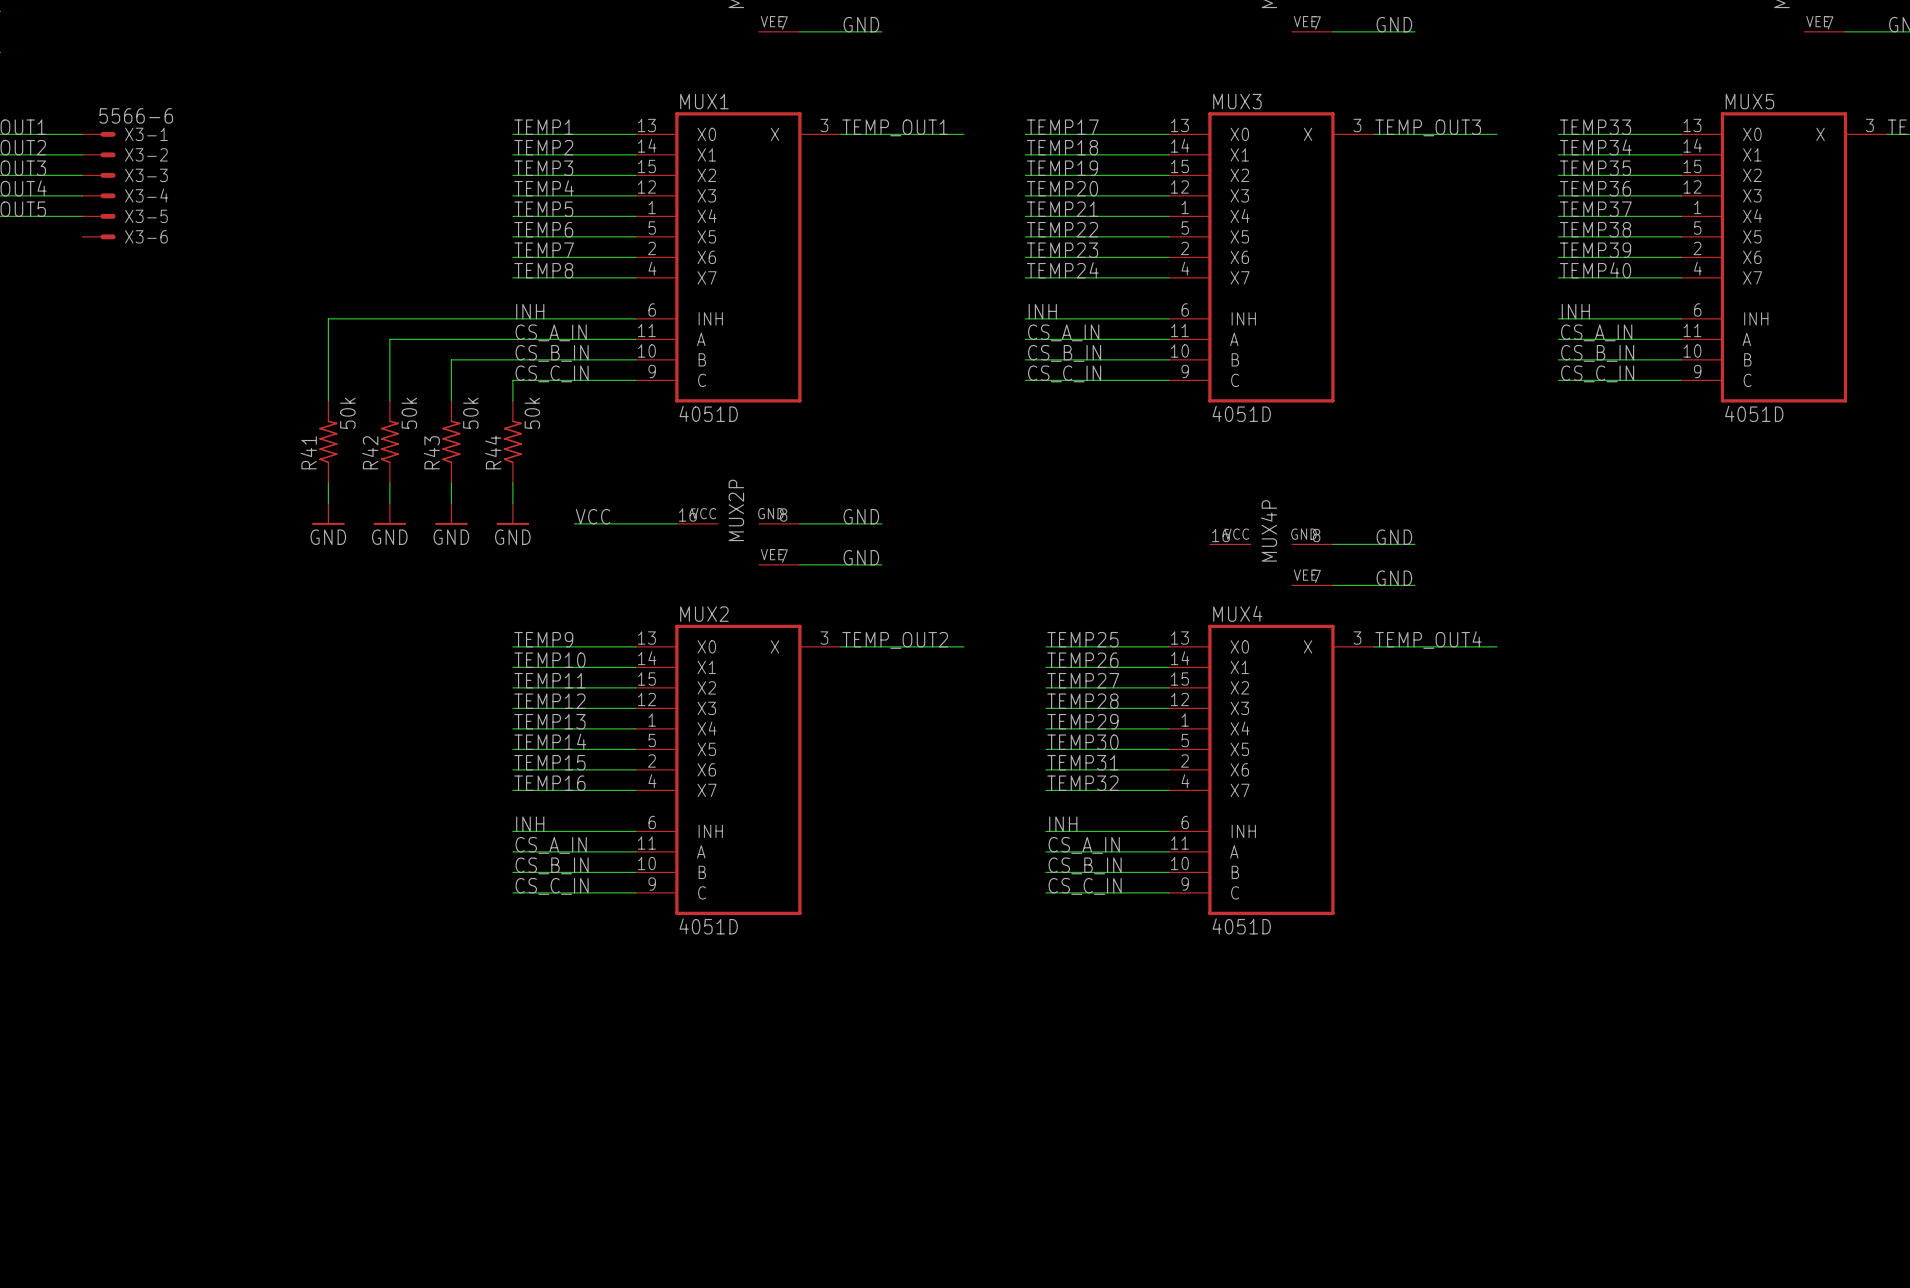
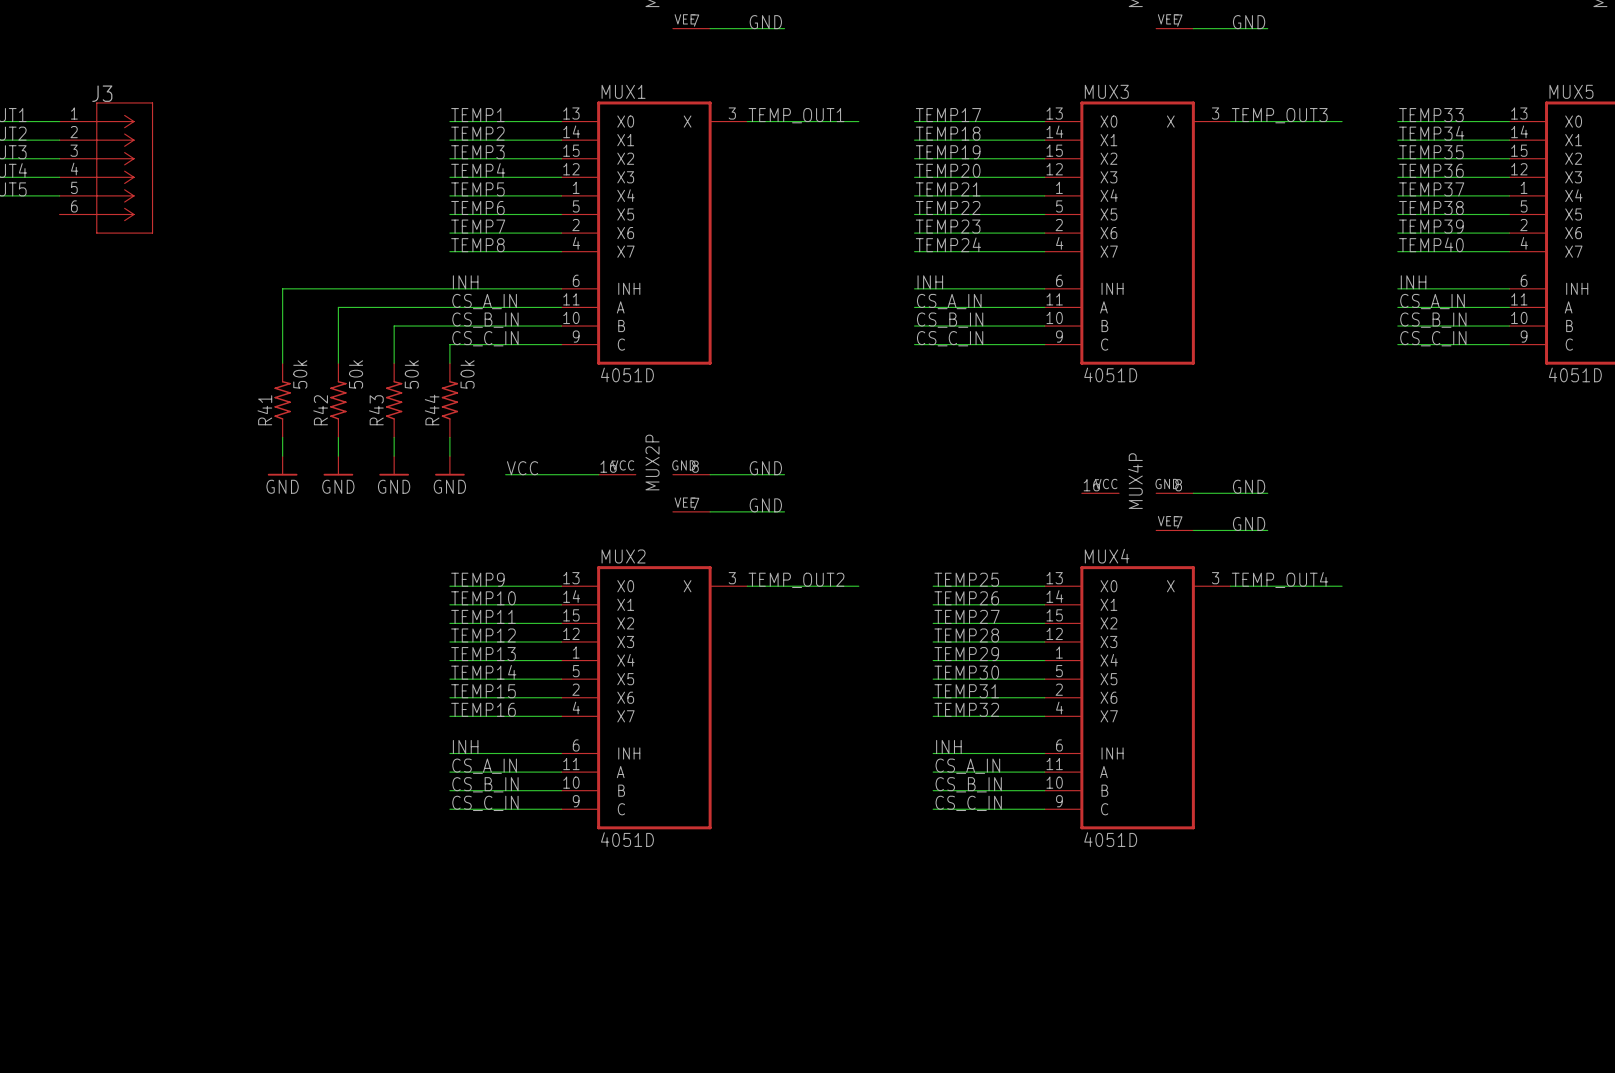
X3-1: 5566-6 (98, 134) -> none
X3-2: (98, 154) -> none
X3-3: (98, 175) -> none
J3: none -> (106, 168)
X3-4: (98, 195) -> none
X3-5: (98, 216) -> none
X3-6: (98, 236) -> none

